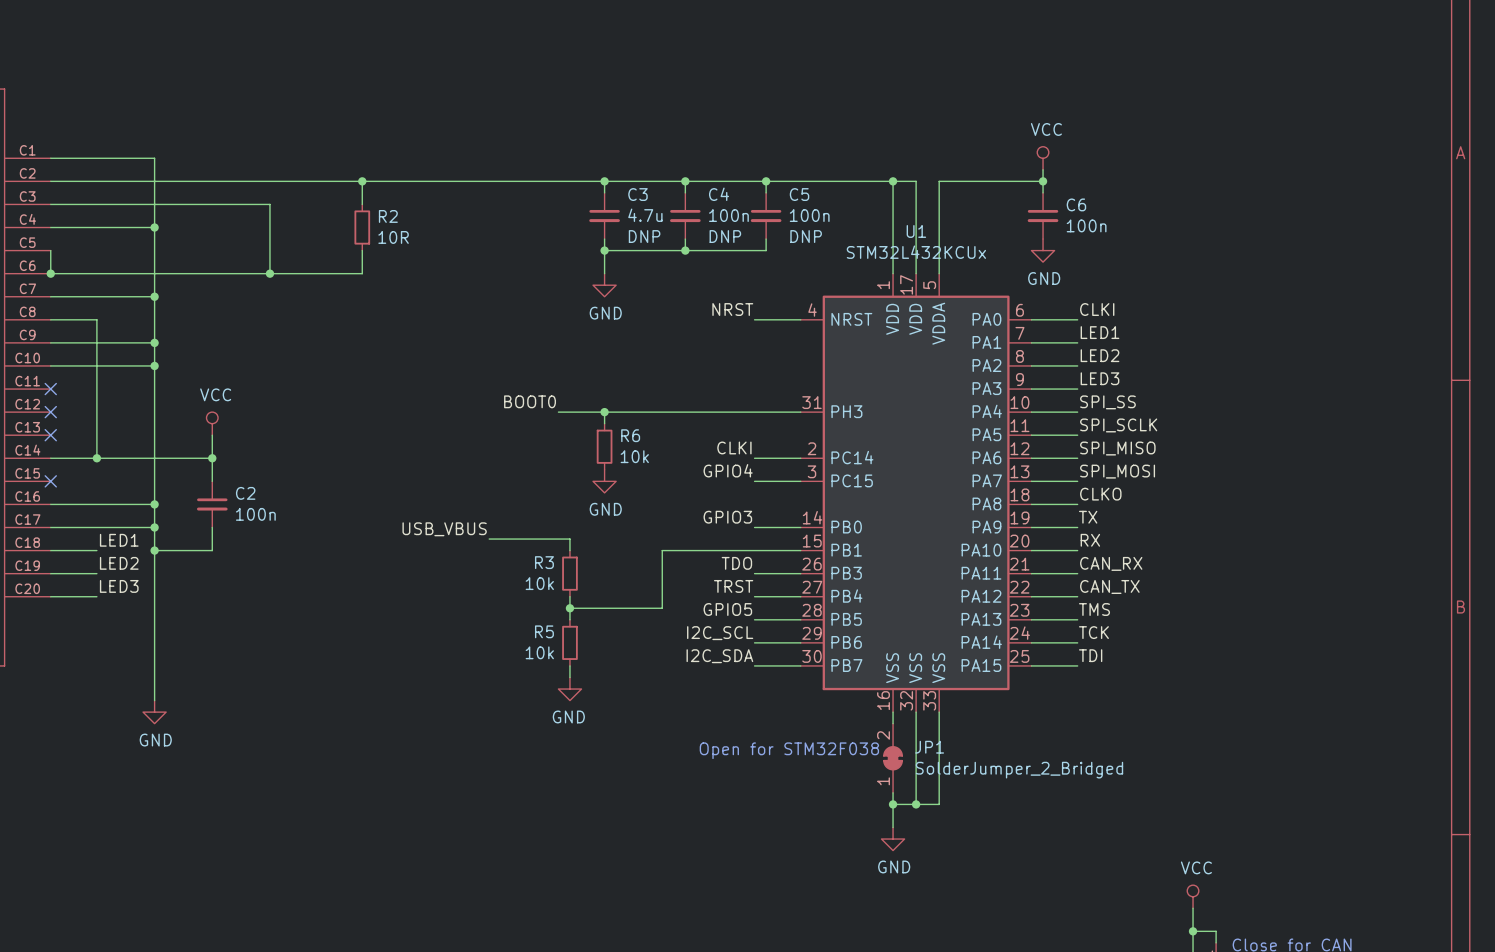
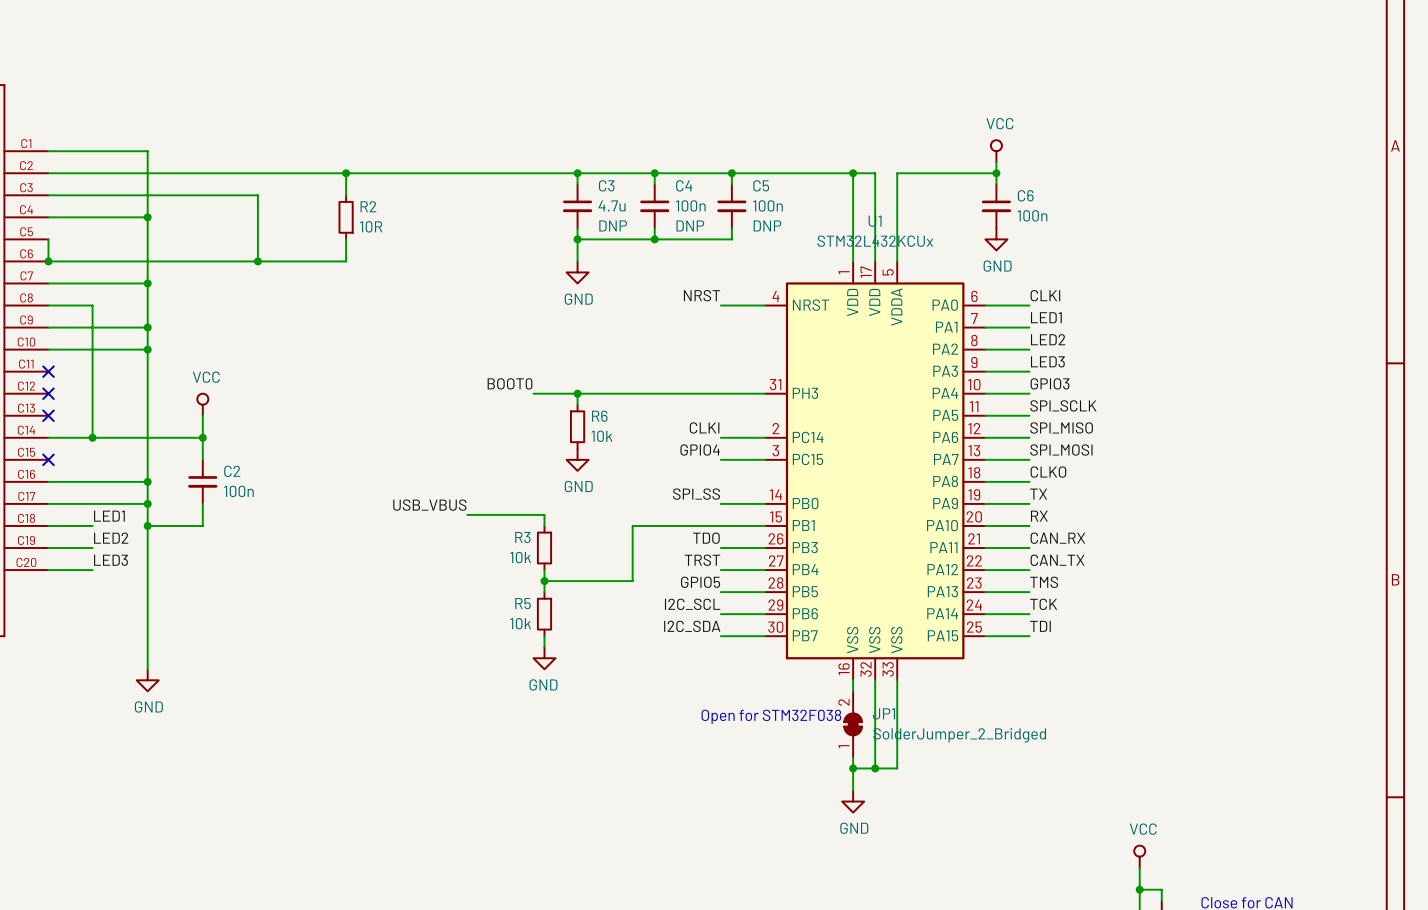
label: SPI_SS (1107, 402) -> GPIO3 (1050, 383)
label: GPIO3 (727, 517) -> SPI_SS (696, 494)

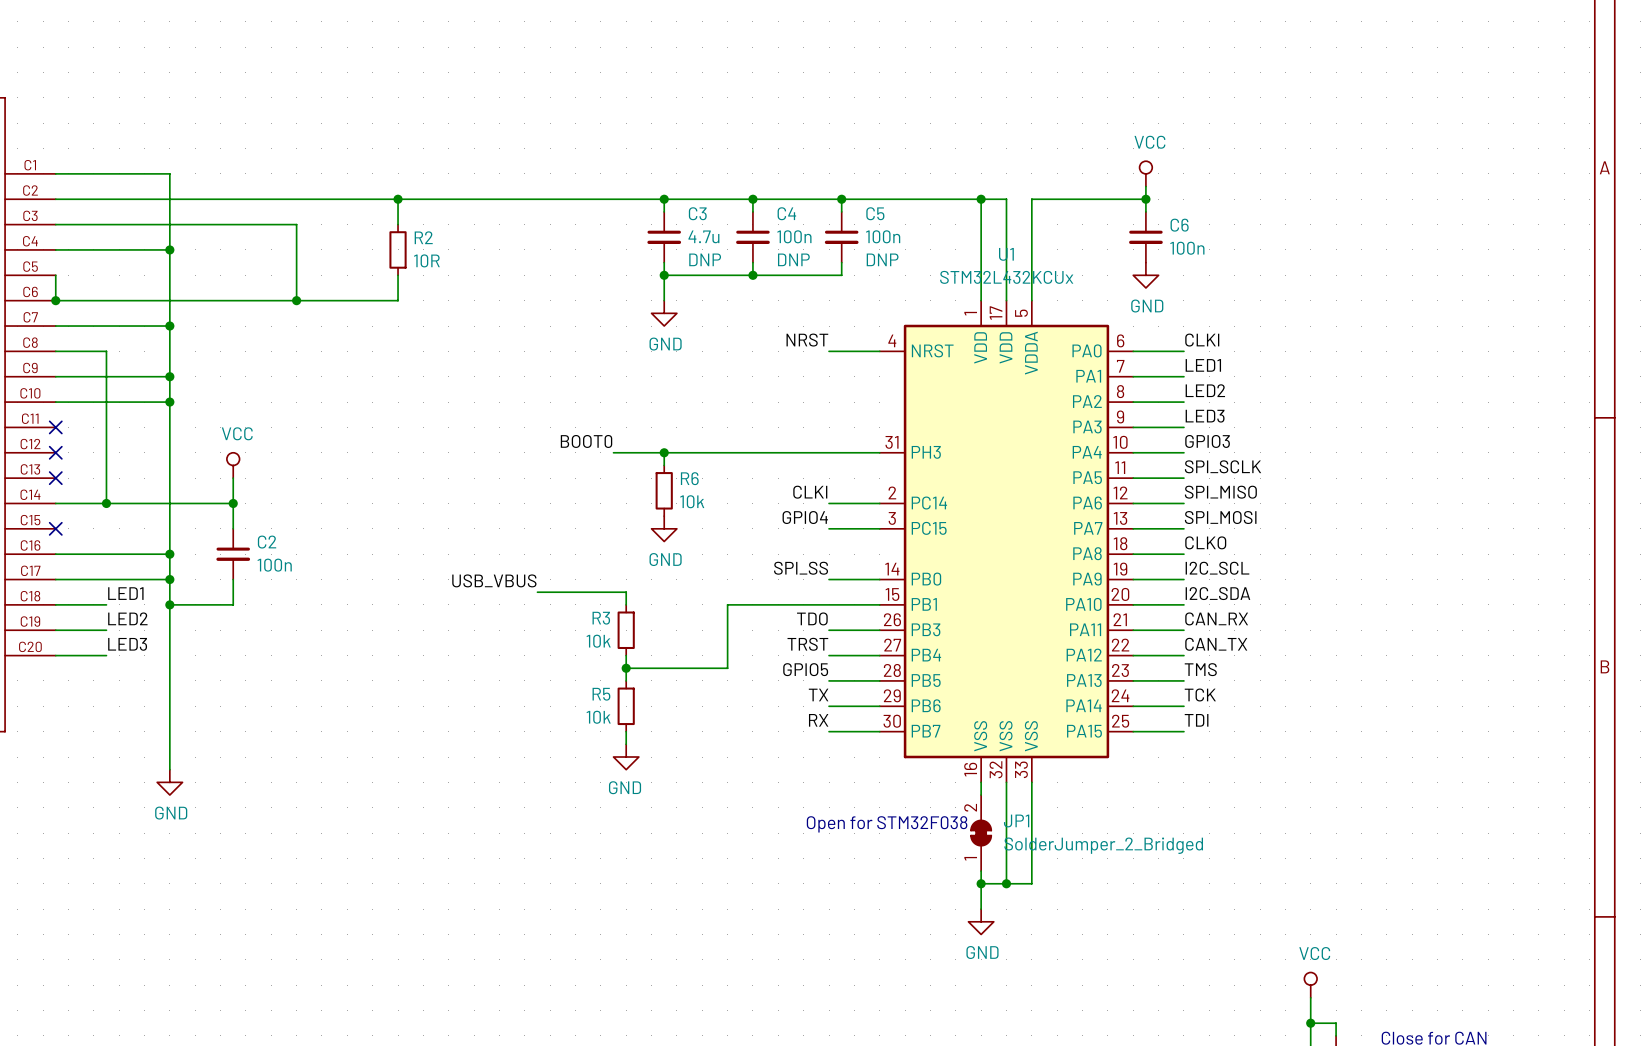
label: TX (1038, 494) -> I2C_SCL (1217, 568)
label: RX (1039, 516) -> I2C_SDA (1217, 593)
label: I2C_SCL (692, 604) -> TX (818, 694)
label: I2C_SDA (692, 626) -> RX (818, 720)

